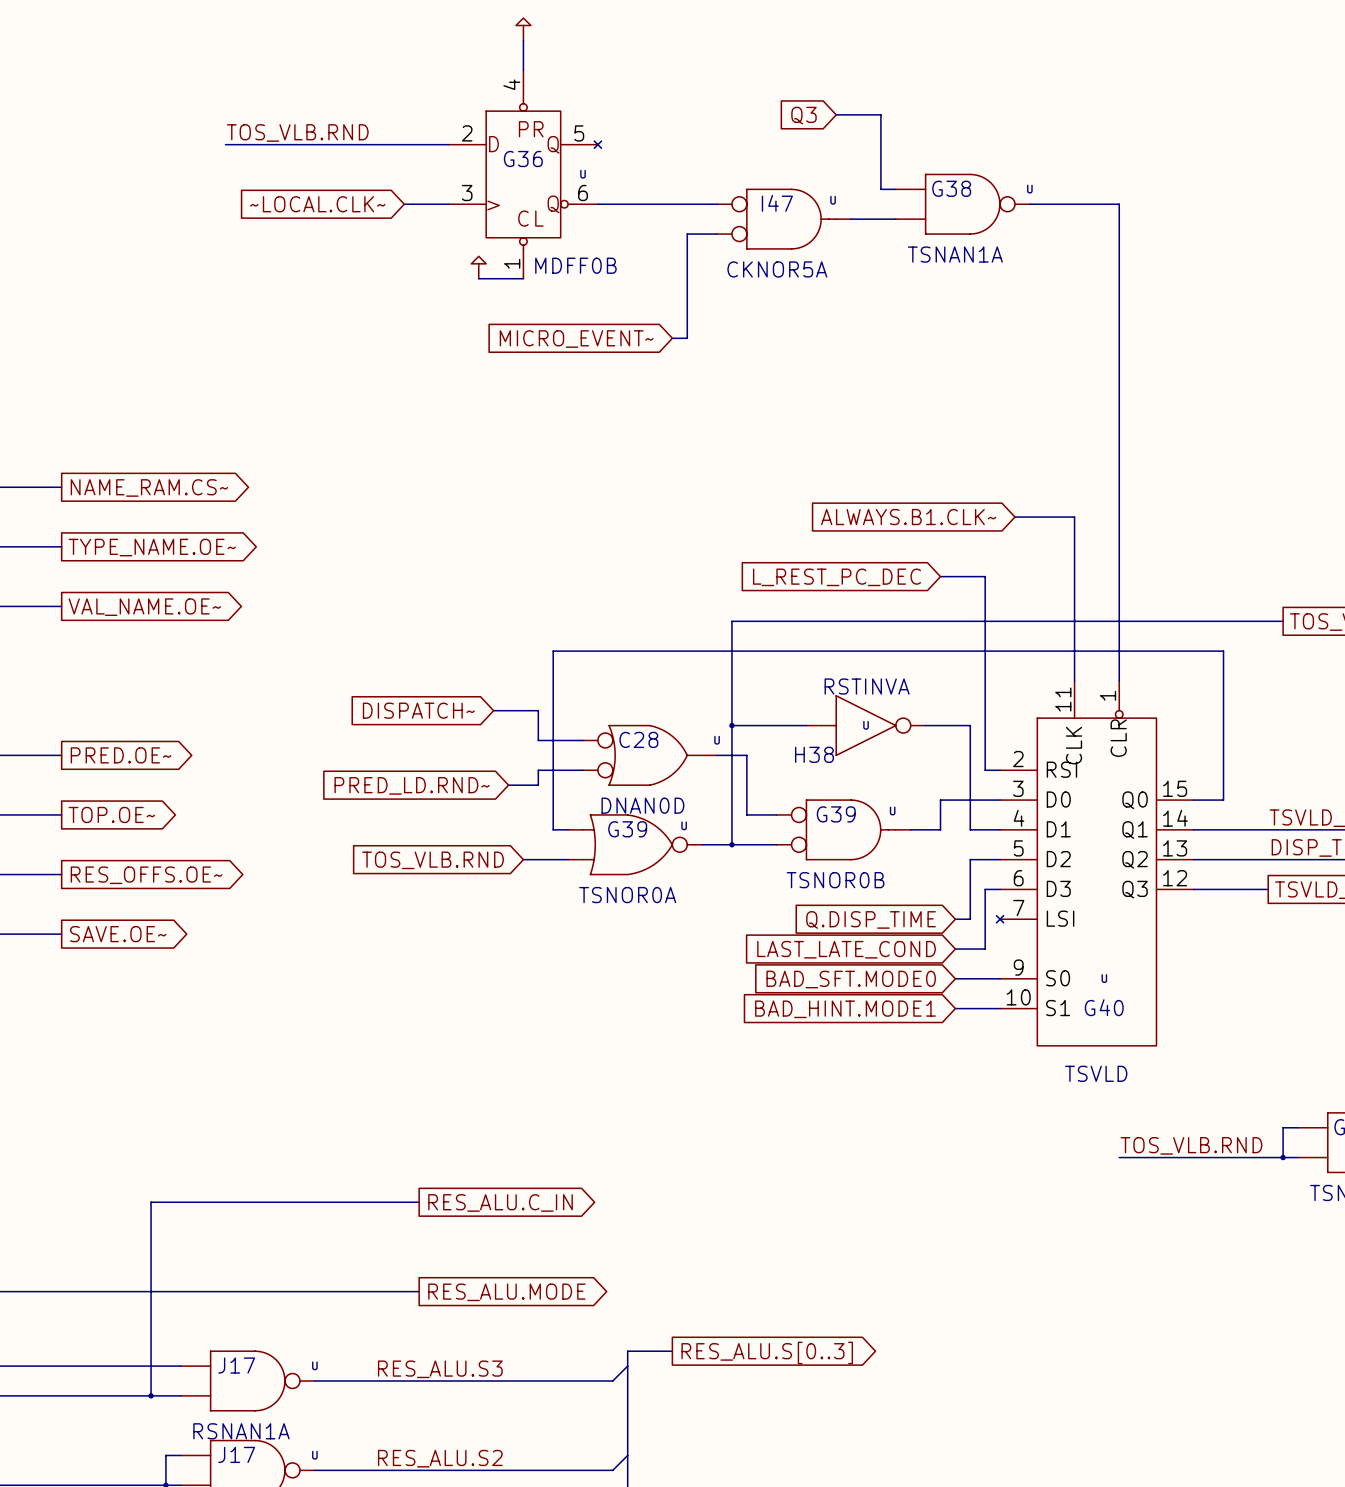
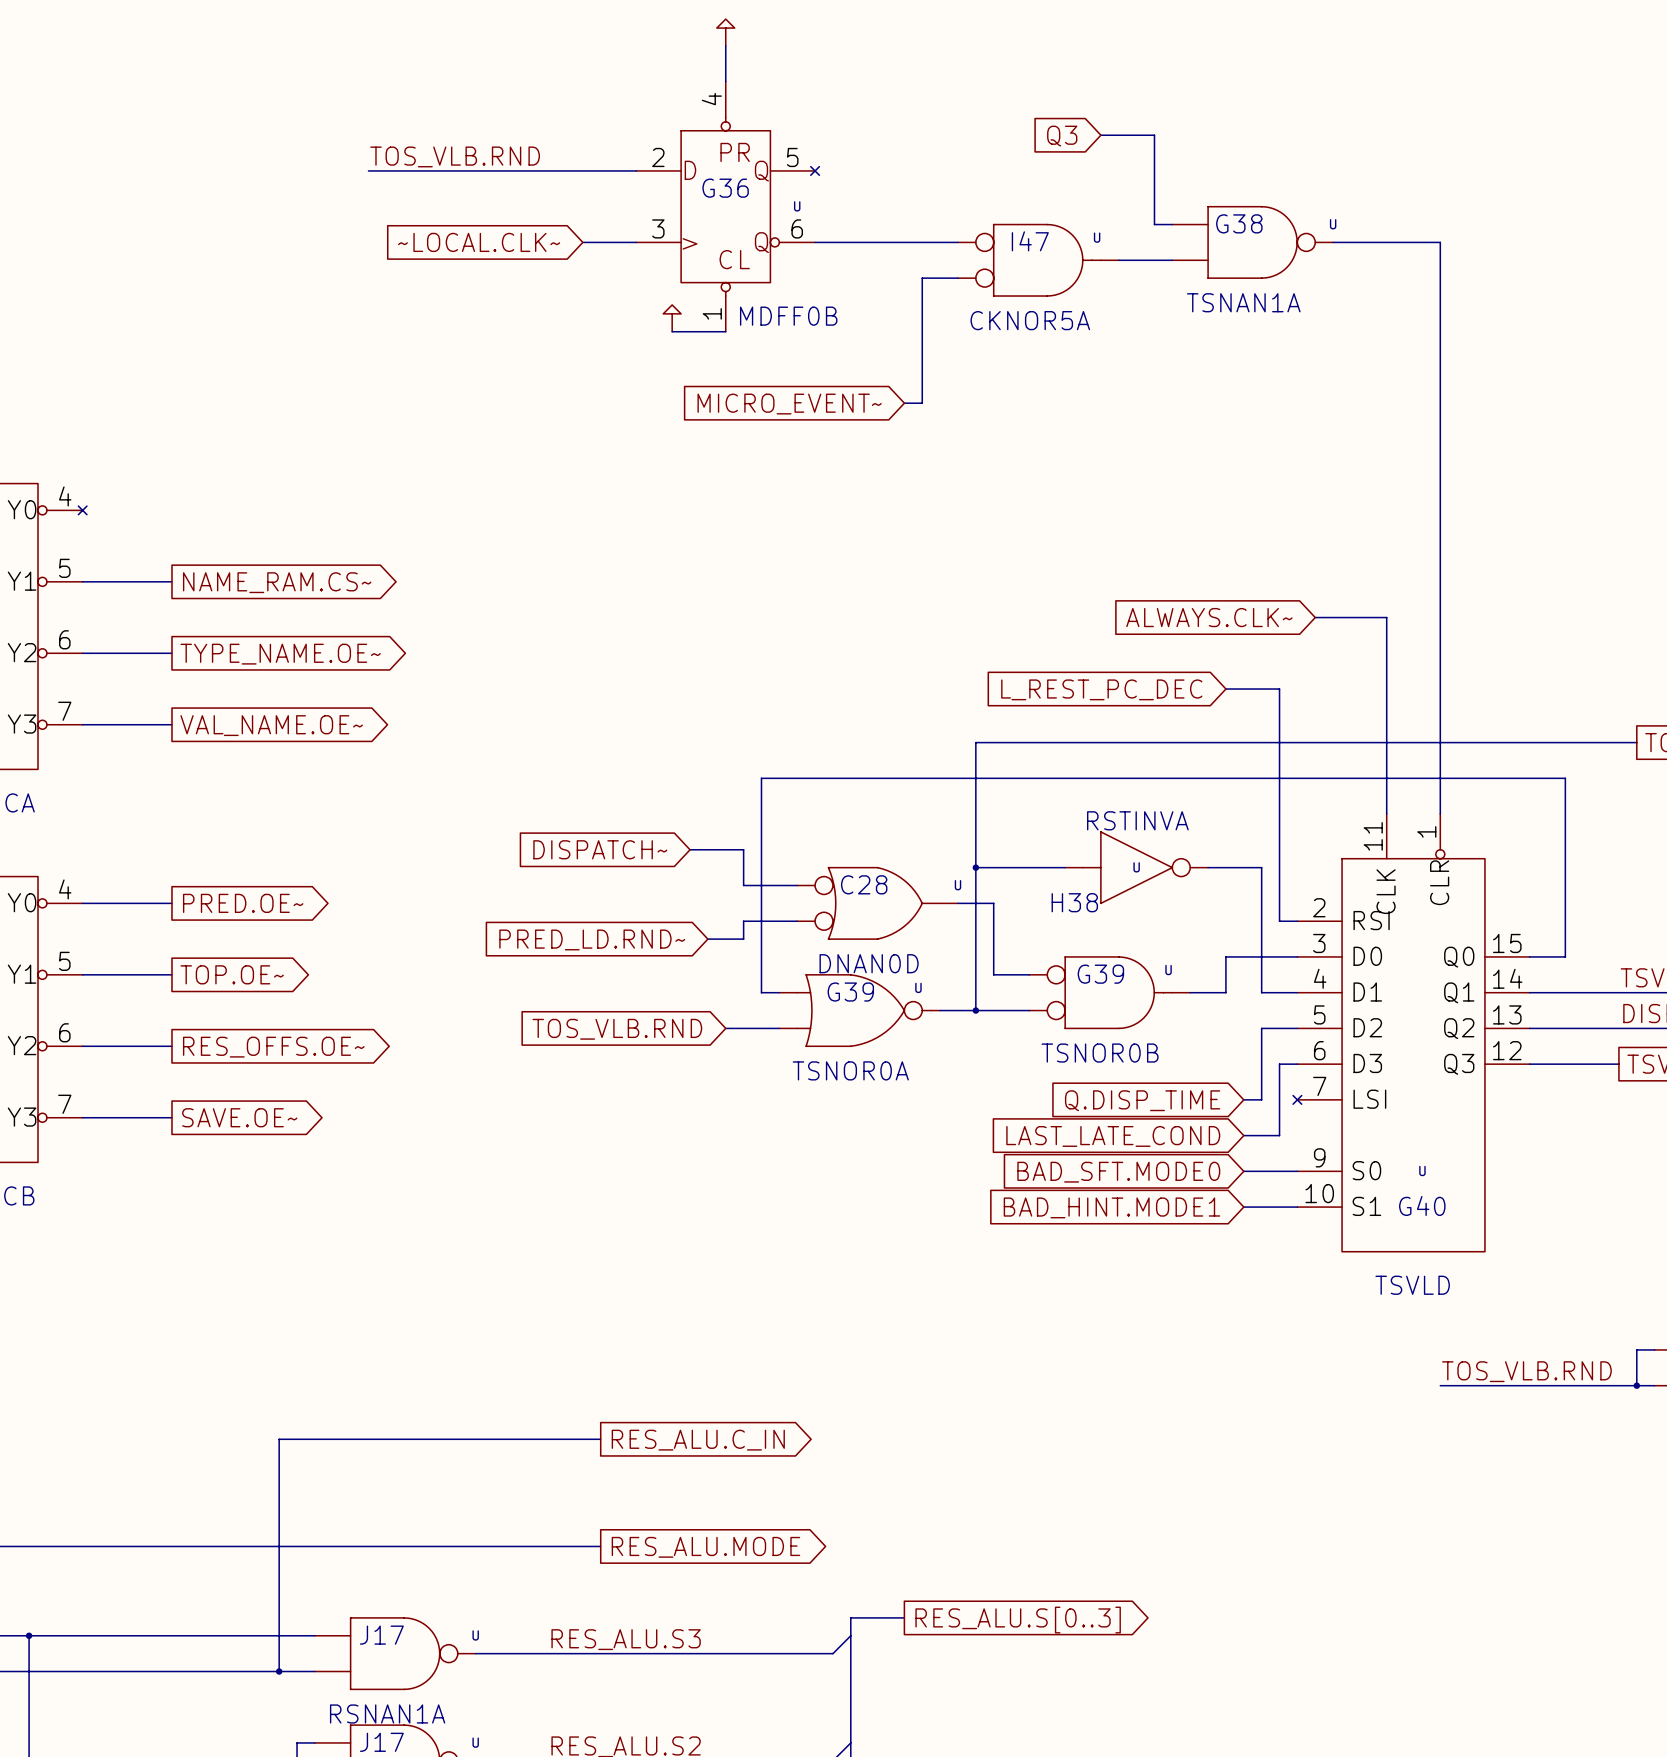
global label: ALWAYS.B1.CLK~ (908, 517) -> ALWAYS.CLK~ (1209, 617)

